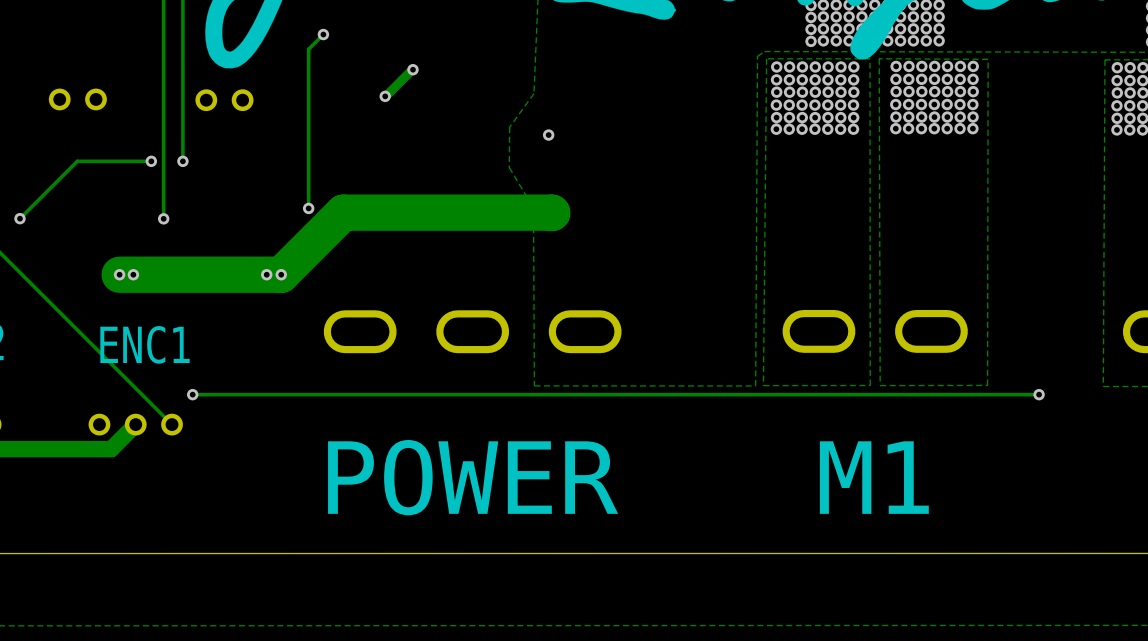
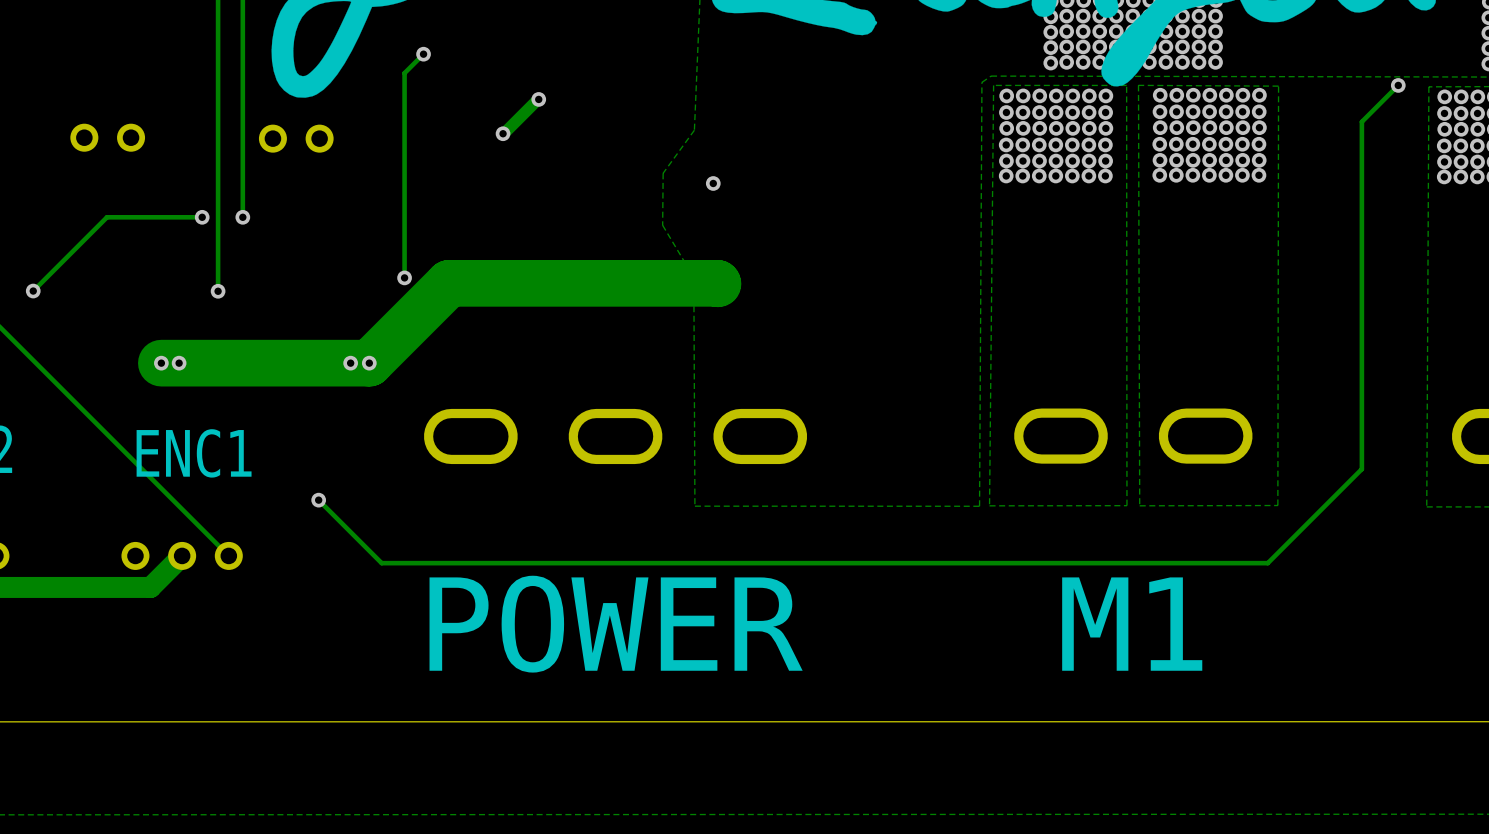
track: none -> (1398, 85) (1361, 121) (1361, 469) (1267, 563) (381, 563) (318, 500)
via: none -> (1398, 85)
via position: (192, 394) -> (318, 500)
track: (1039, 394) (192, 394) -> none
via: (1039, 394) -> none

